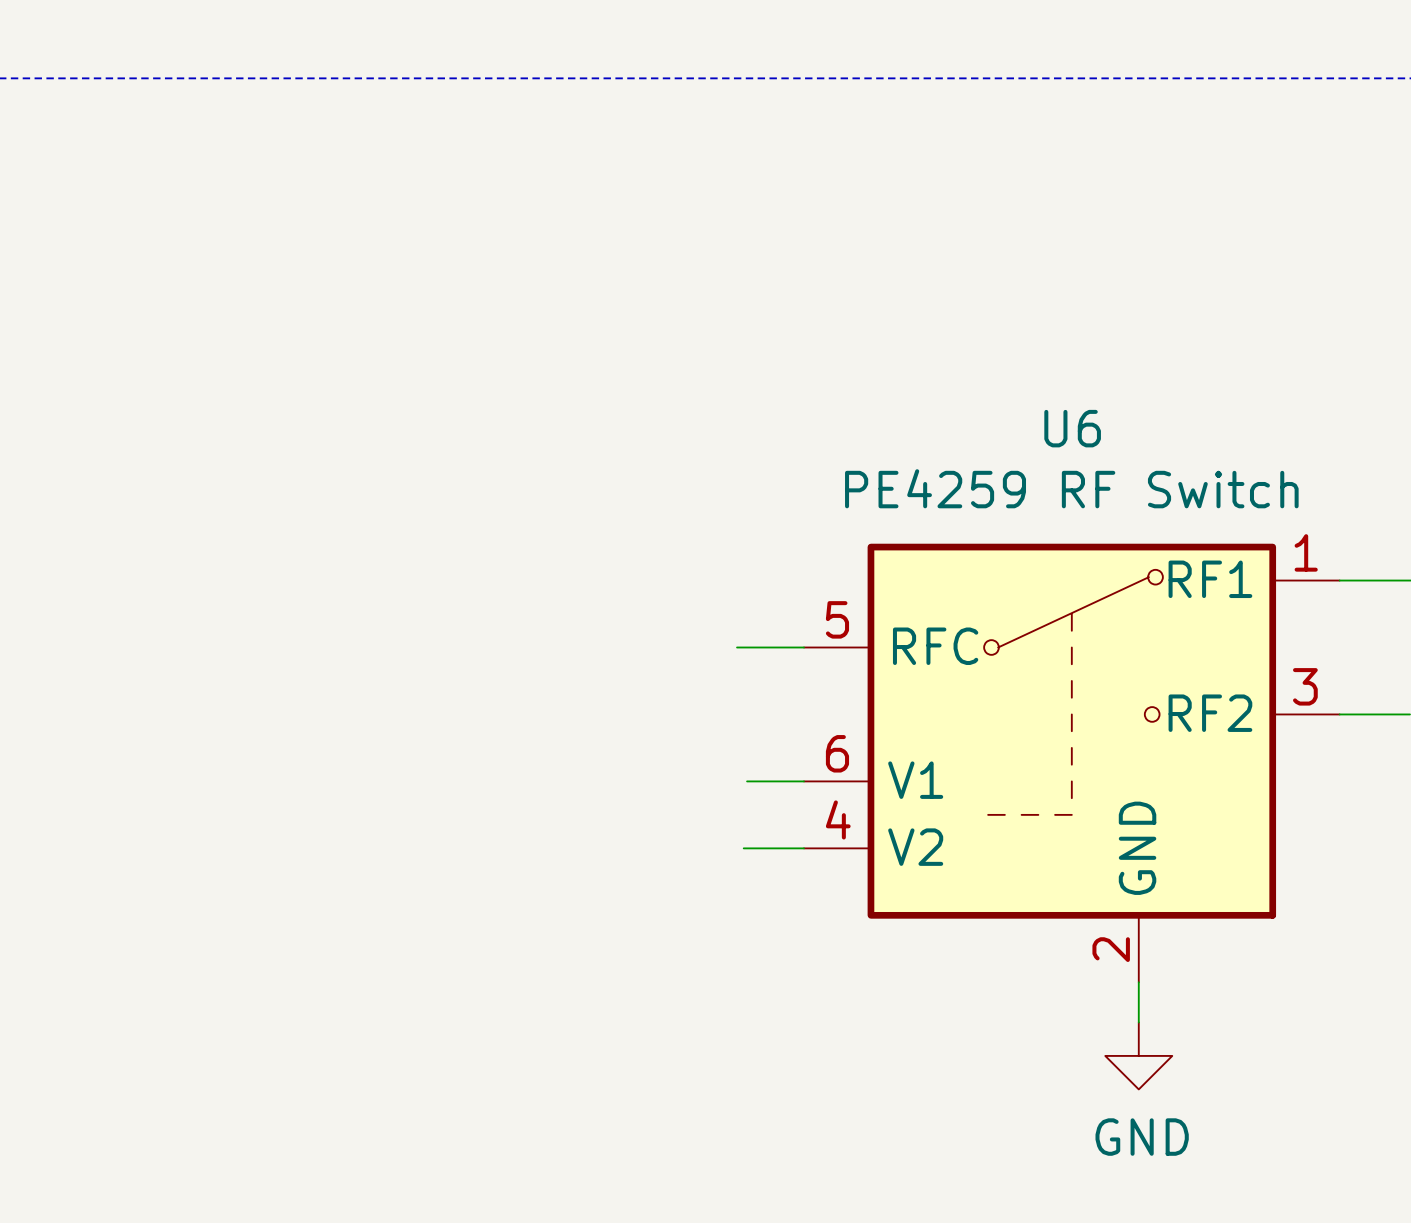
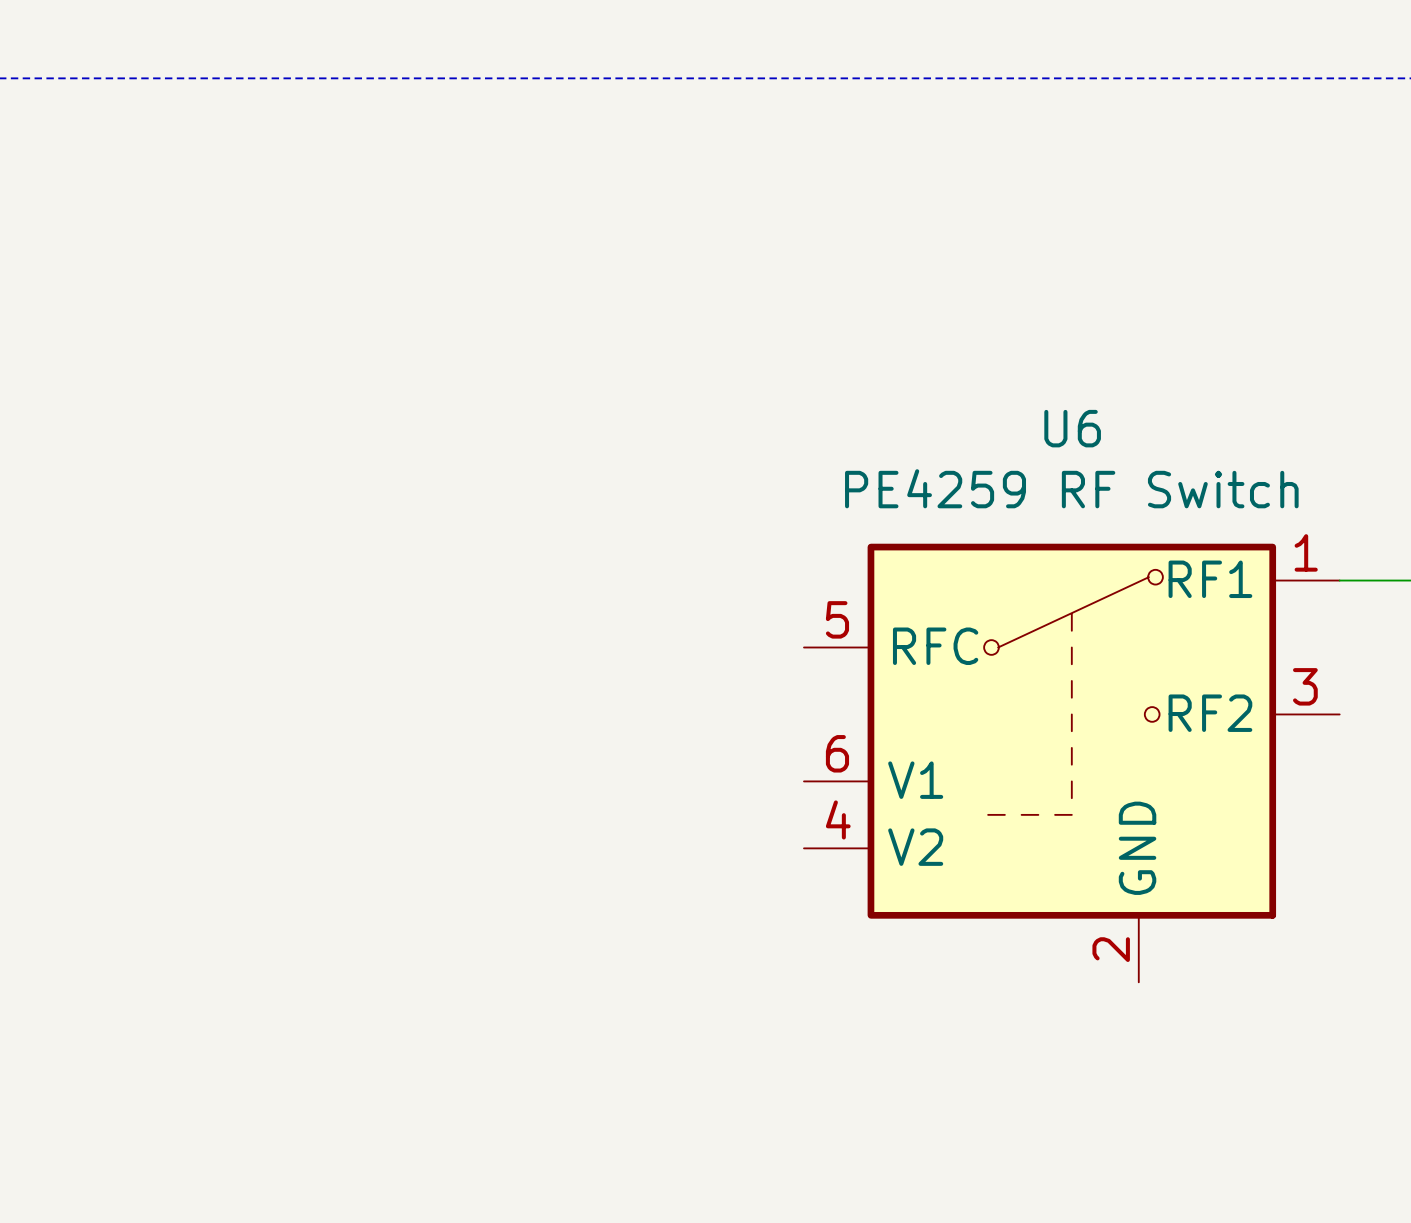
wire: (737, 647) (804, 647) -> none
wire: (1339, 714) (1409, 714) -> none
wire: (747, 781) (804, 781) -> none
wire: (743, 848) (804, 848) -> none
wire: (1138, 982) (1138, 1022) -> none
power symbol: GND (1138, 1055) -> none

